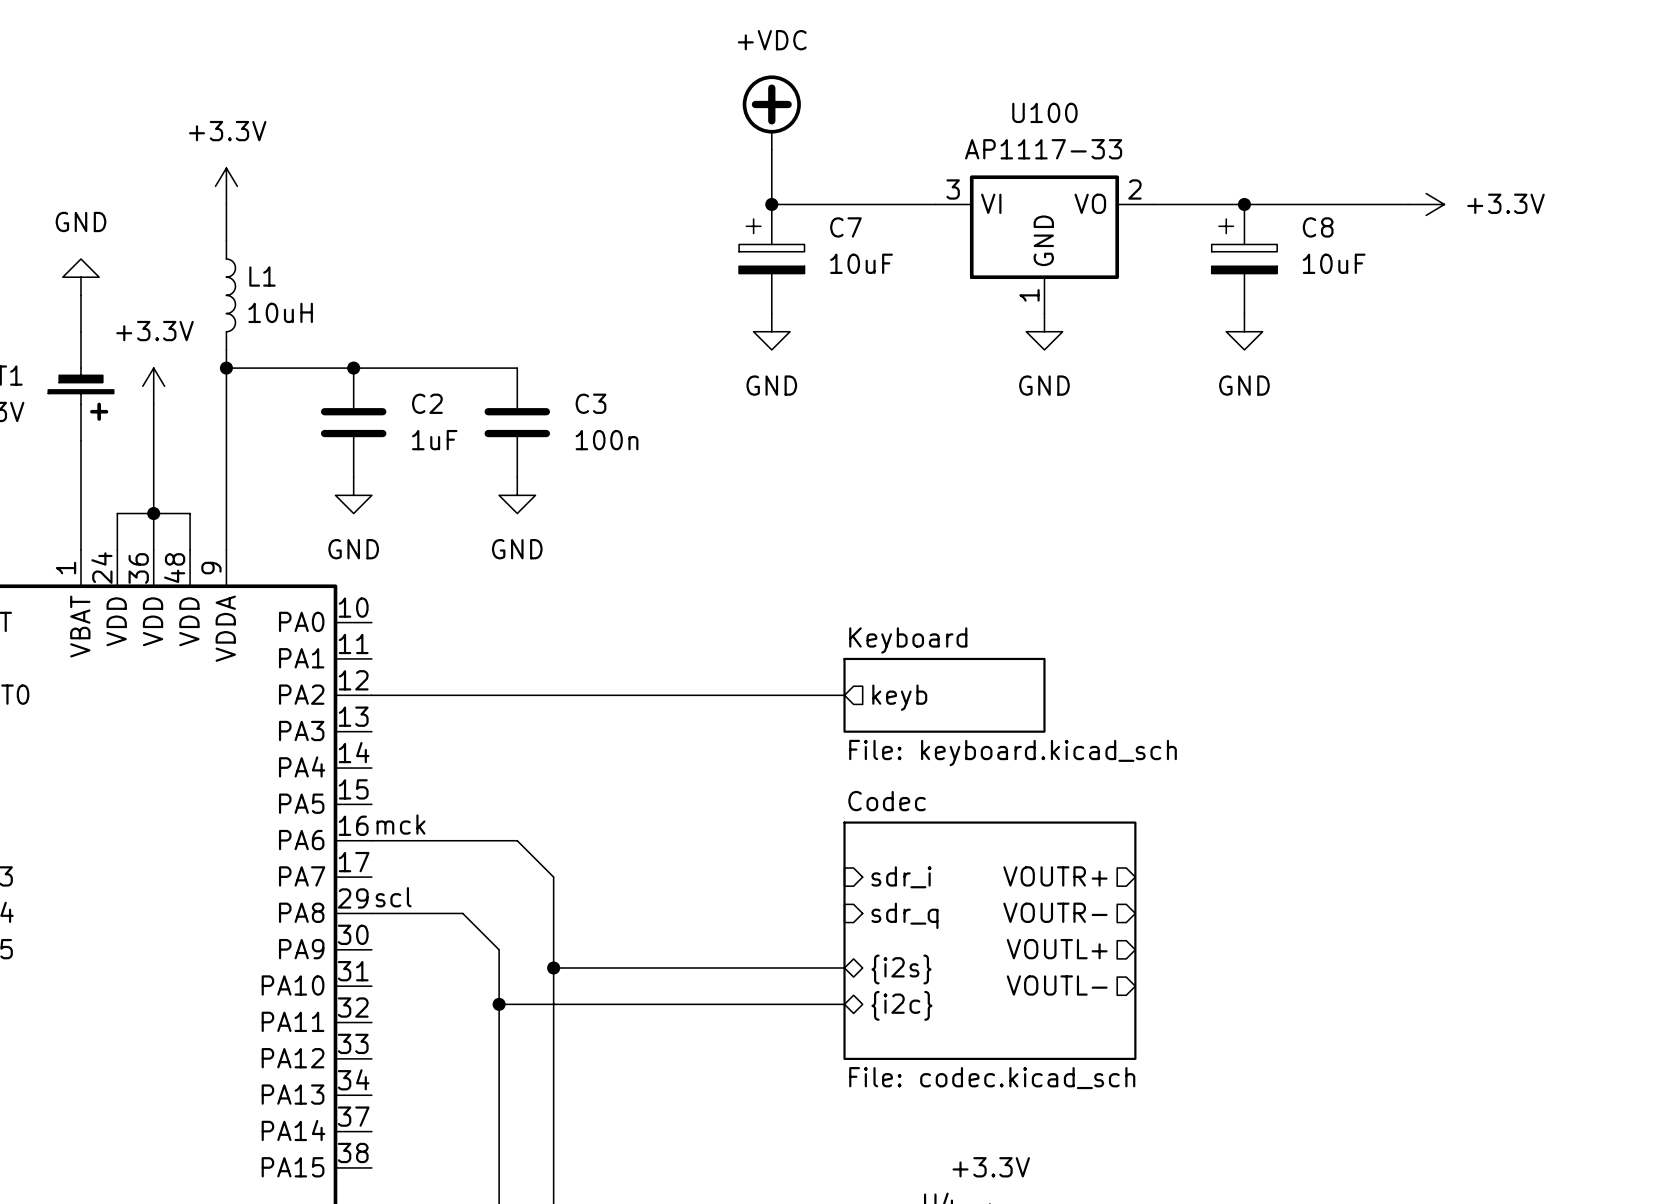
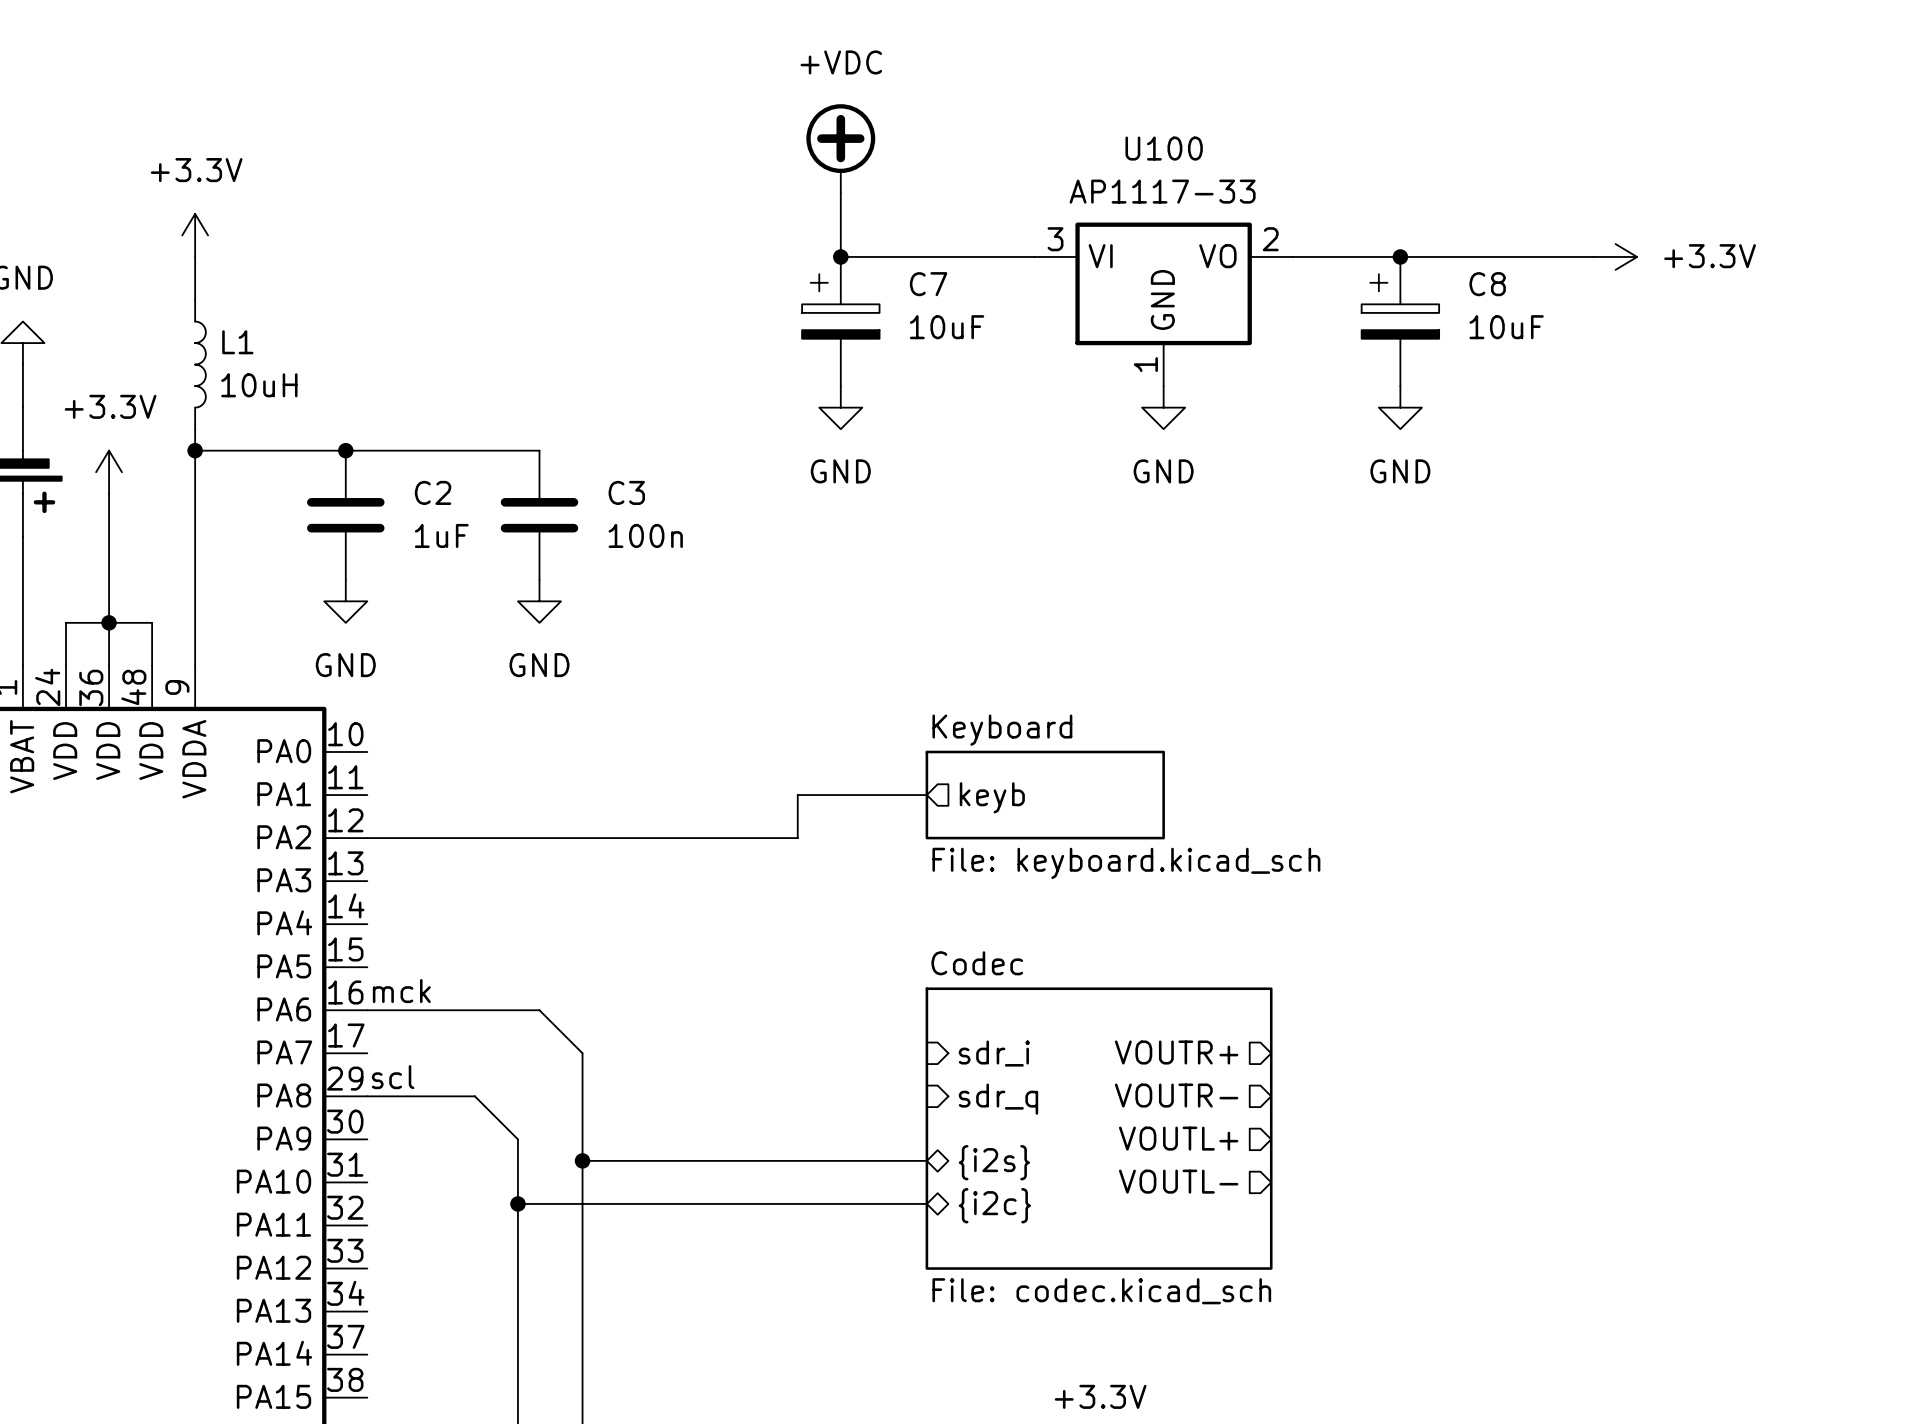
wire: (735, 695) (844, 695) -> (797, 838) (797, 795) (926, 795)
sheet Keyboard position: (944, 695) -> (1045, 795)
sheet pin position: keyb (899, 697) -> keyb (992, 797)

